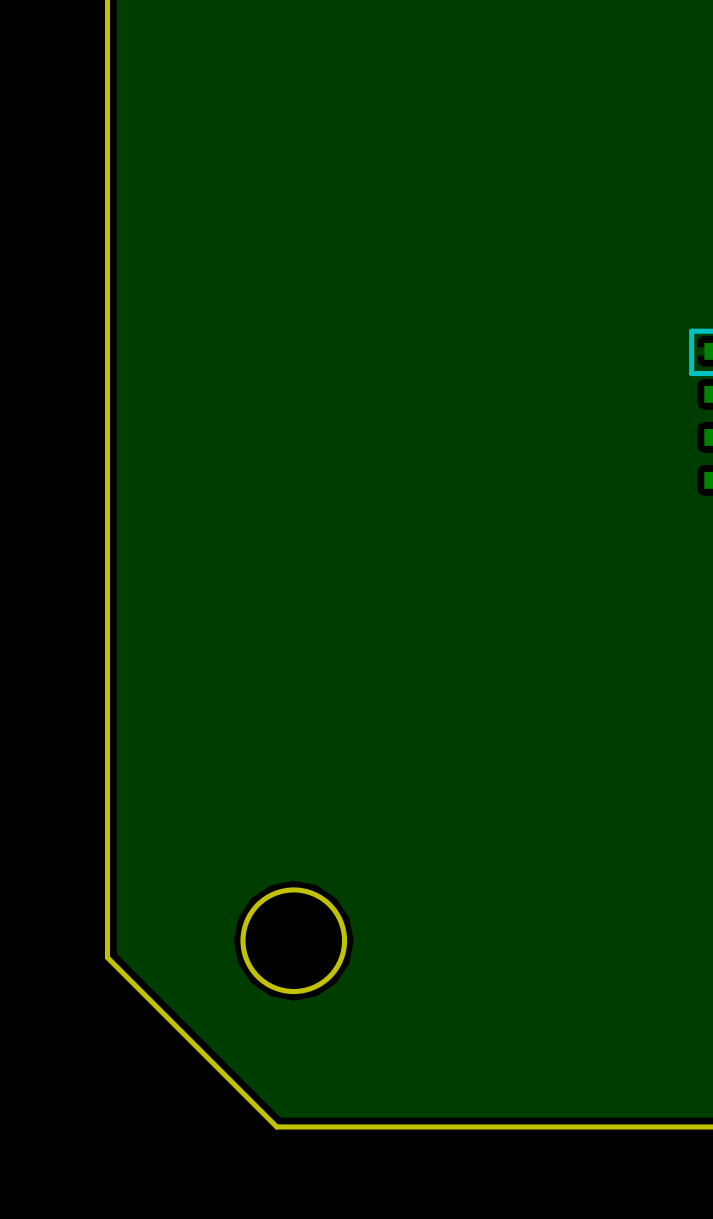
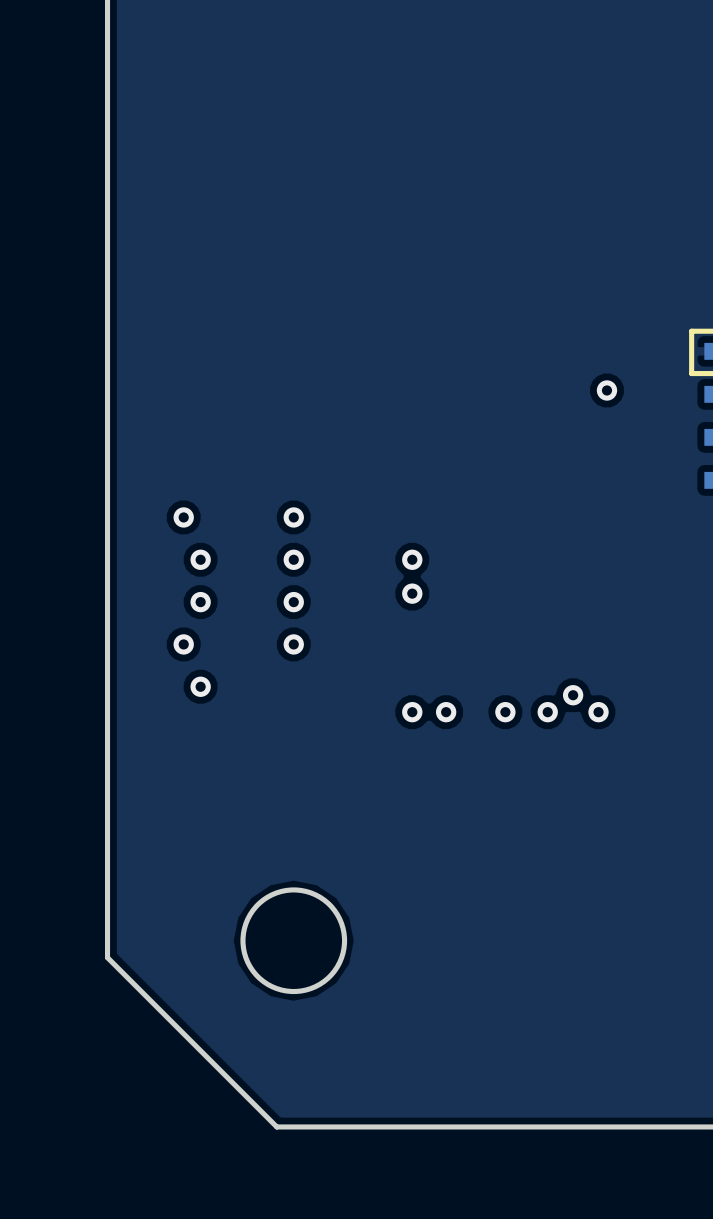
via: none -> (606, 390)
via: none -> (183, 517)
via: none -> (293, 517)
via: none -> (200, 559)
via: none -> (293, 559)
via: none -> (412, 559)
via: none -> (412, 593)
via: none -> (200, 602)
via: none -> (293, 602)
via: none -> (183, 644)
via: none -> (293, 644)
via: none -> (200, 686)
via: none -> (573, 695)
via: none -> (412, 712)
via: none -> (446, 712)
via: none -> (505, 712)
via: none -> (547, 712)
via: none -> (598, 712)

